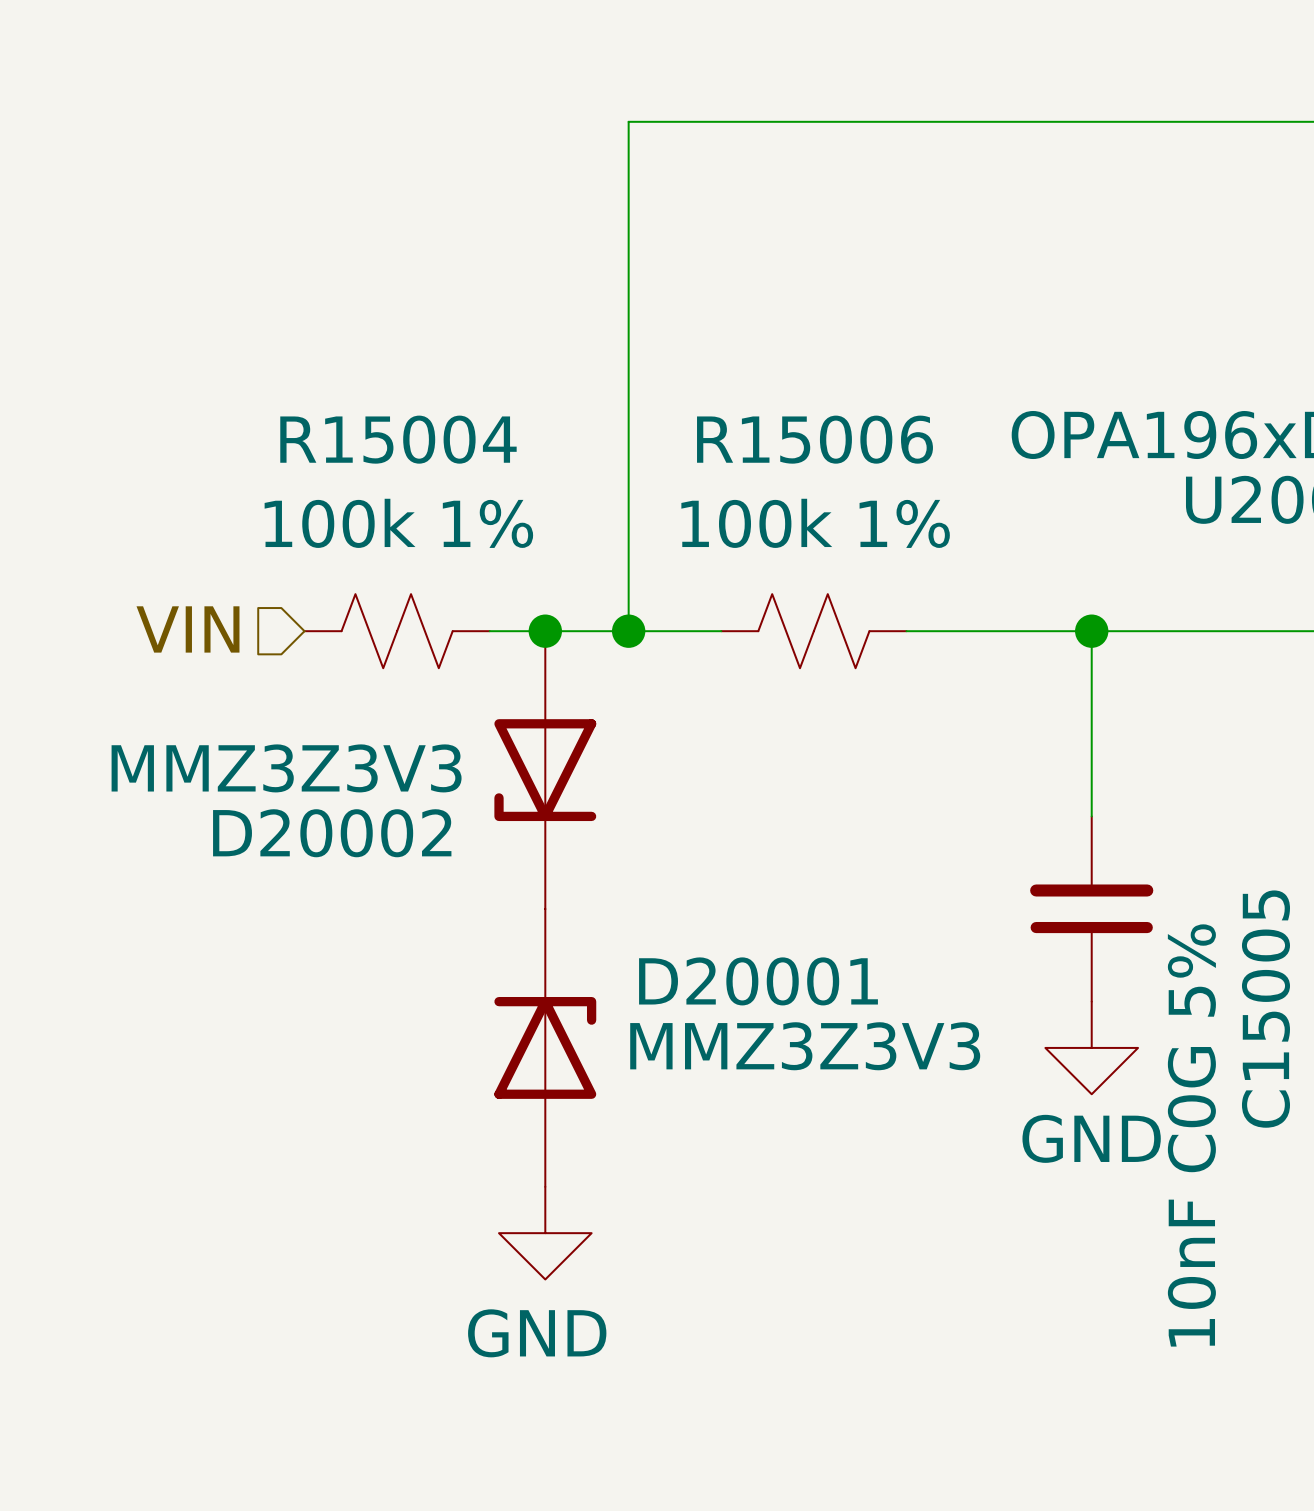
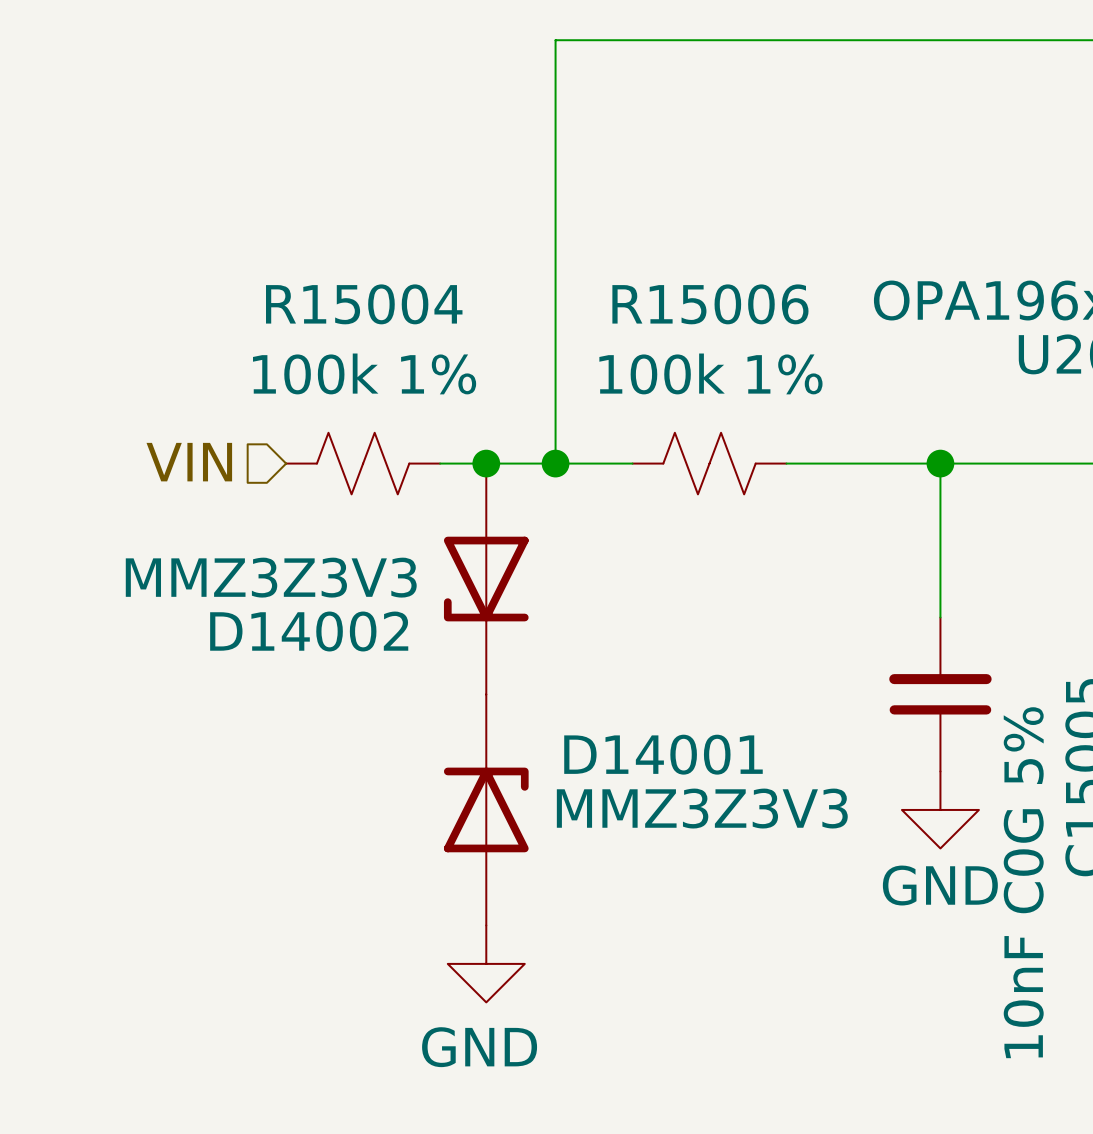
D20002 name: D20002 (332, 833) -> D14002 (309, 631)
D20001 name: D20001 (758, 981) -> D14001 (663, 754)

